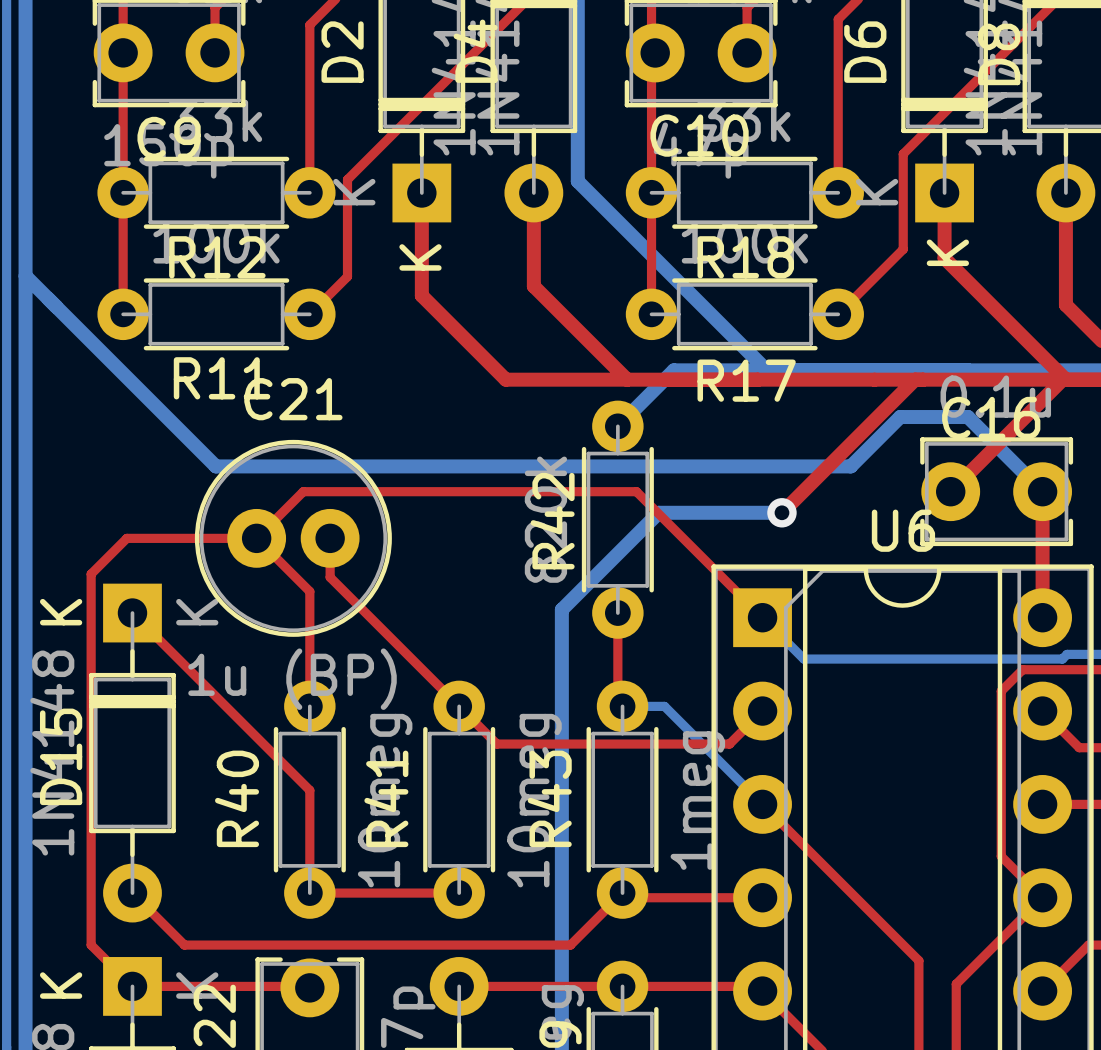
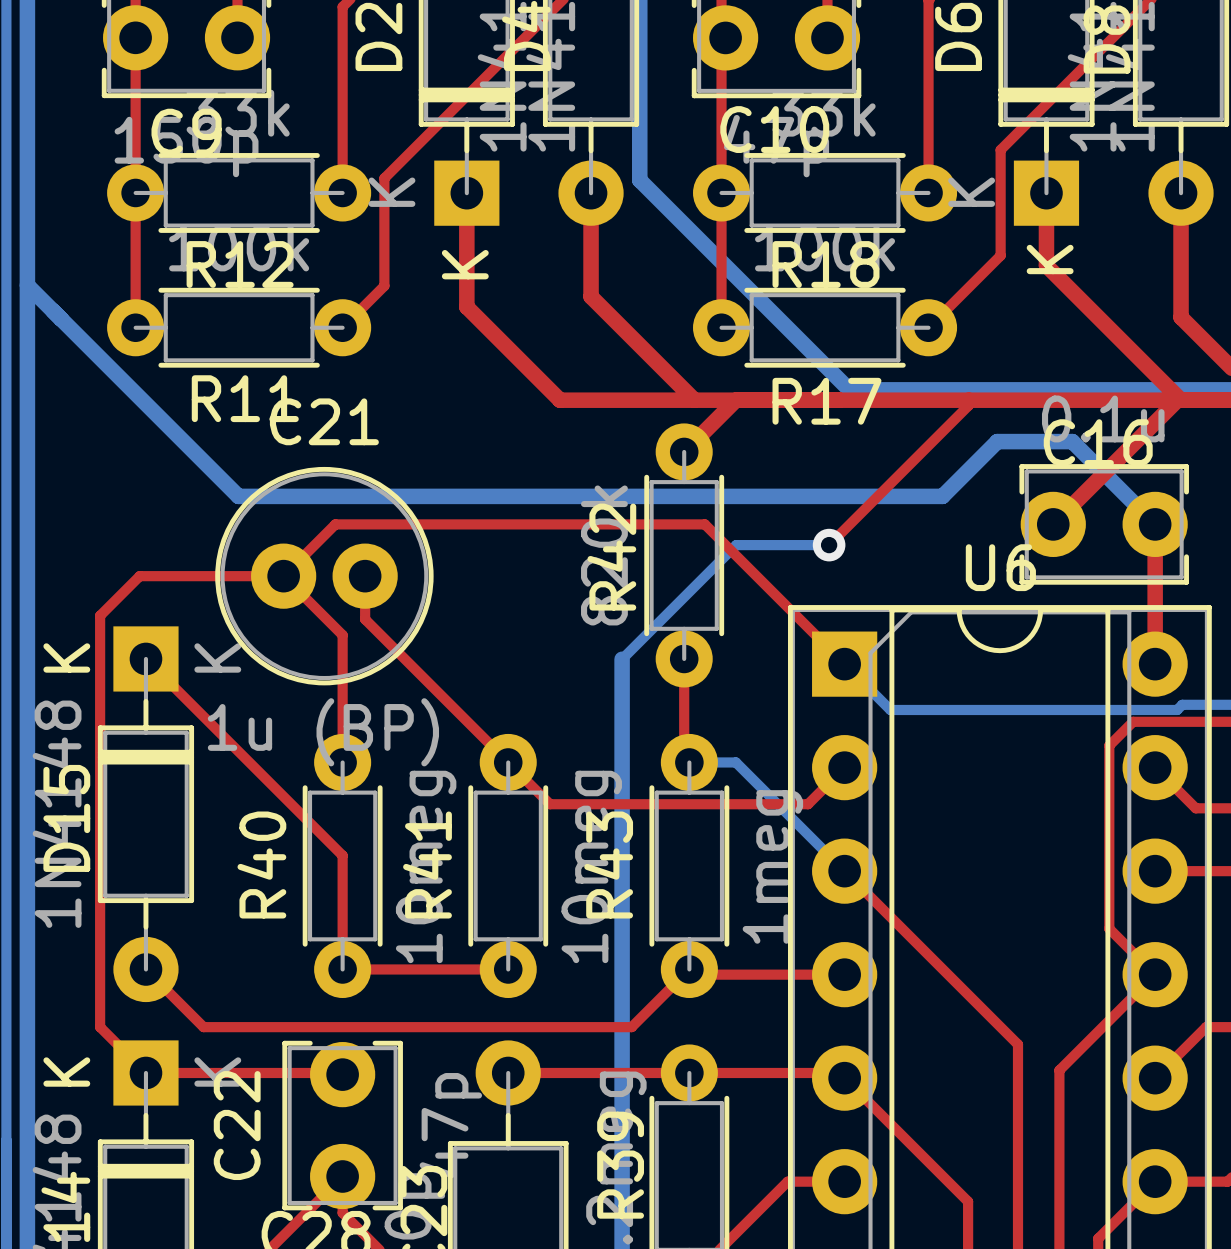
bottom track: (766, 370) (673, 370) (617, 426) -> none
top track: none -> (735, 400) (684, 451)
top track: none -> (968, 400) (968, 405) (829, 545)
top track: (915, 379) (781, 512) -> none
bottom track: (781, 512) (658, 512) (561, 609) (561, 613) -> (829, 545) (736, 545) (622, 659)
via position: (781, 512) -> (829, 545)

